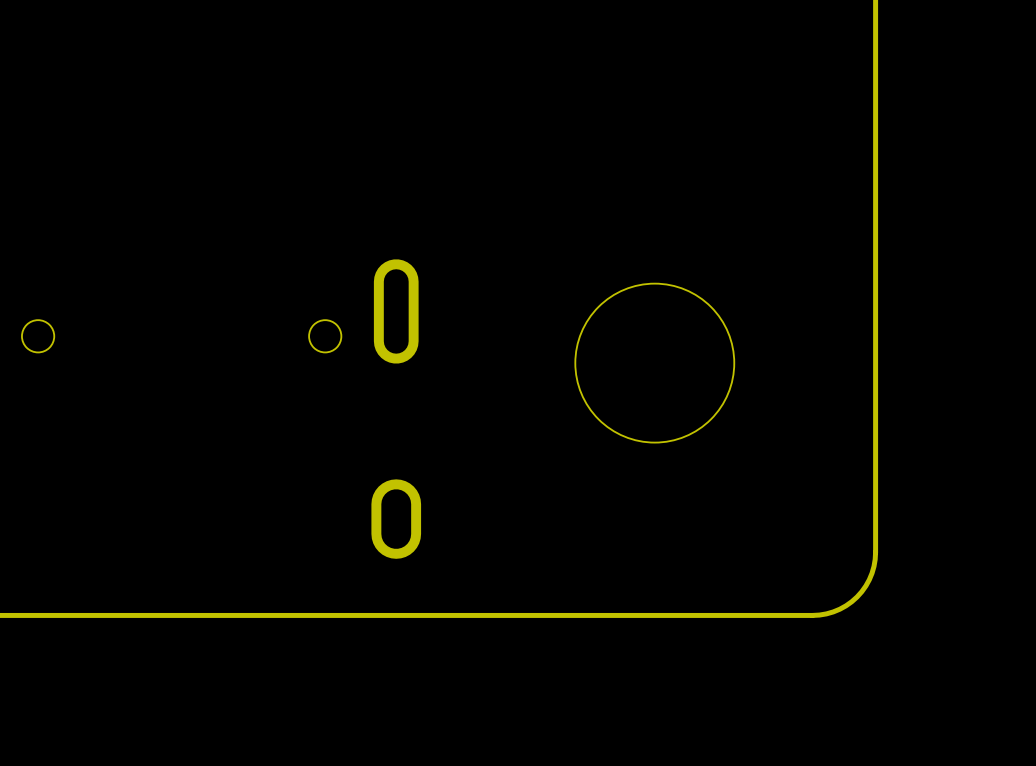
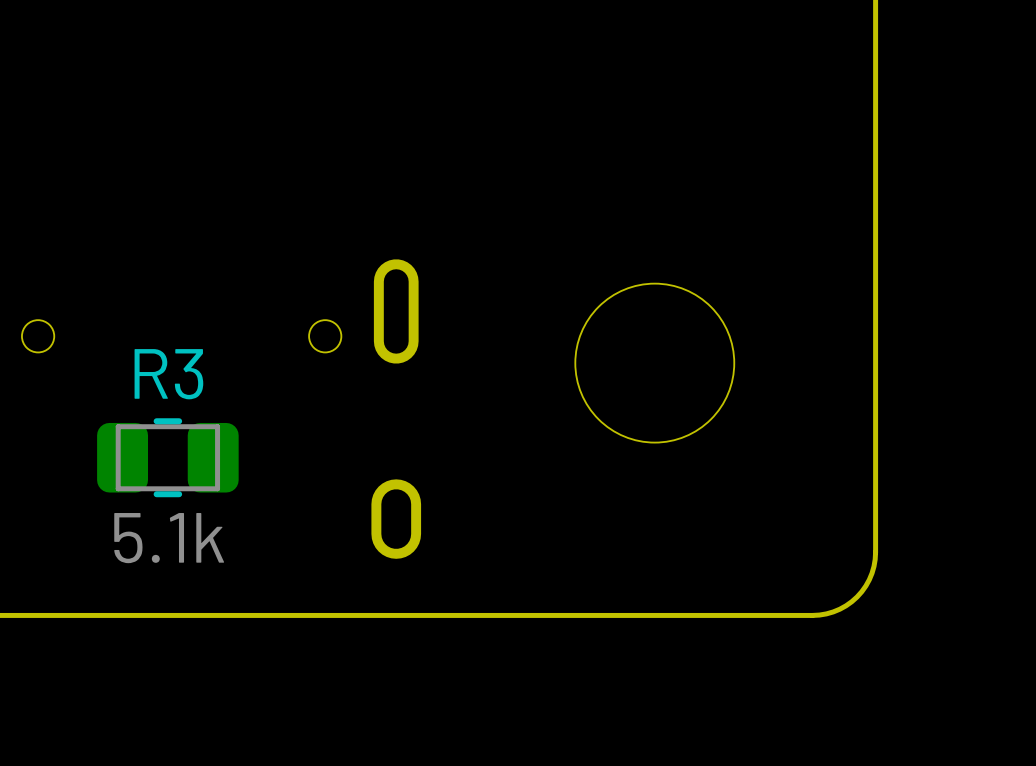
R3: none -> 5.1k (167, 457)

